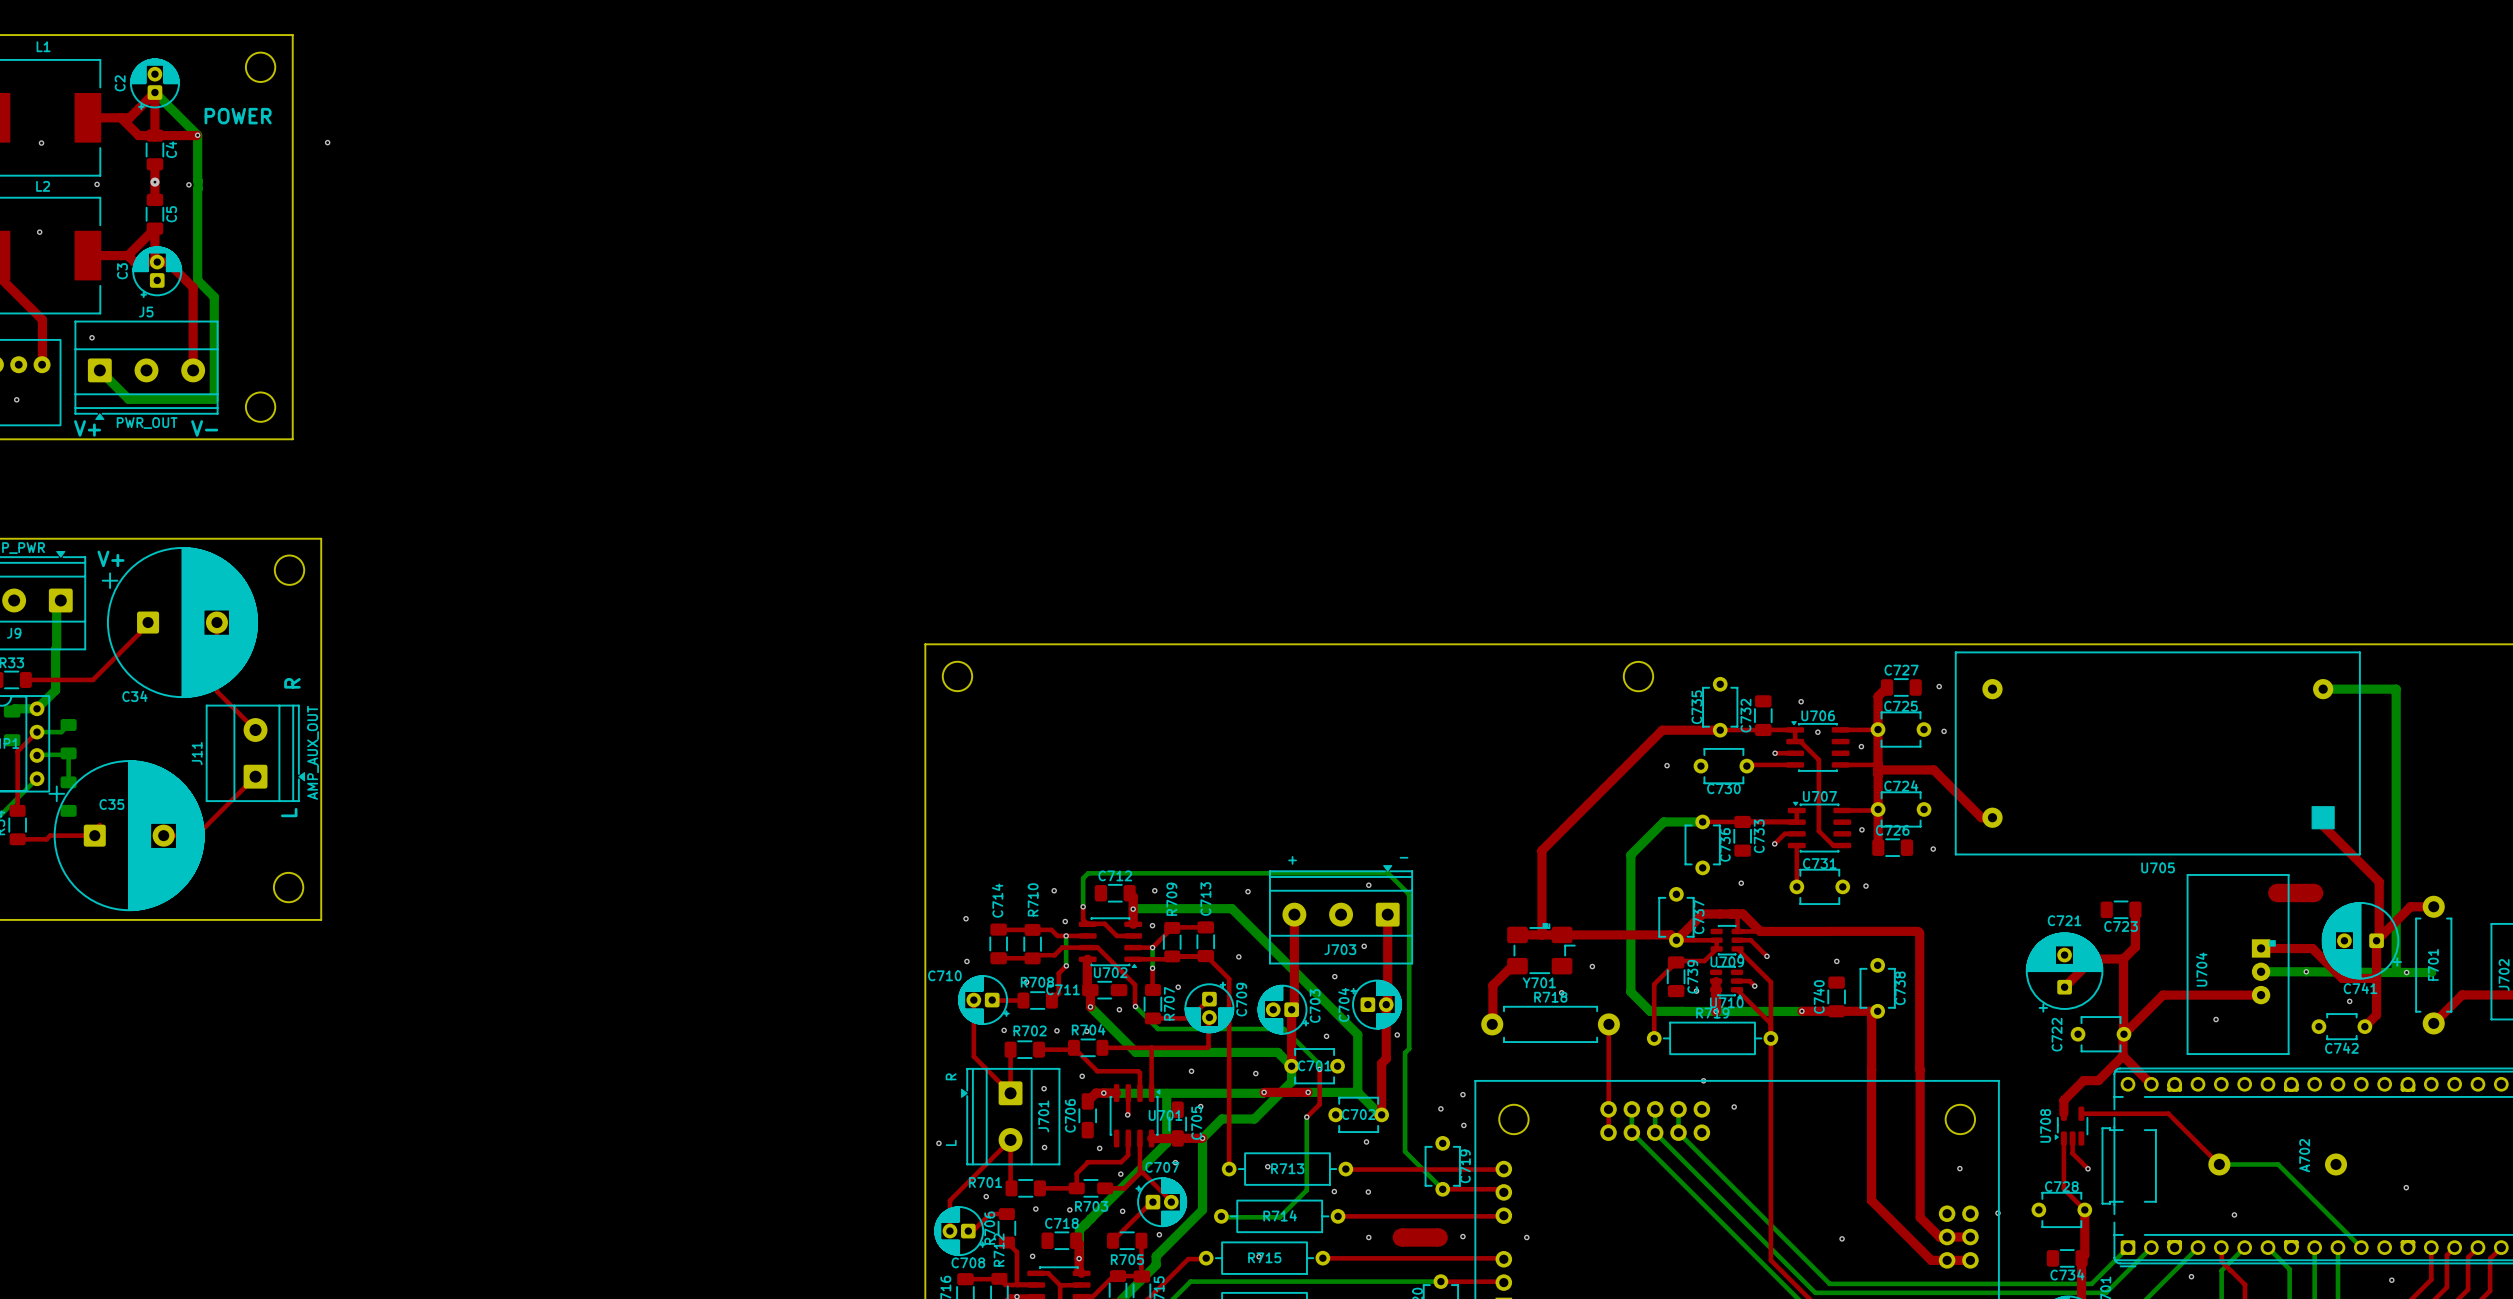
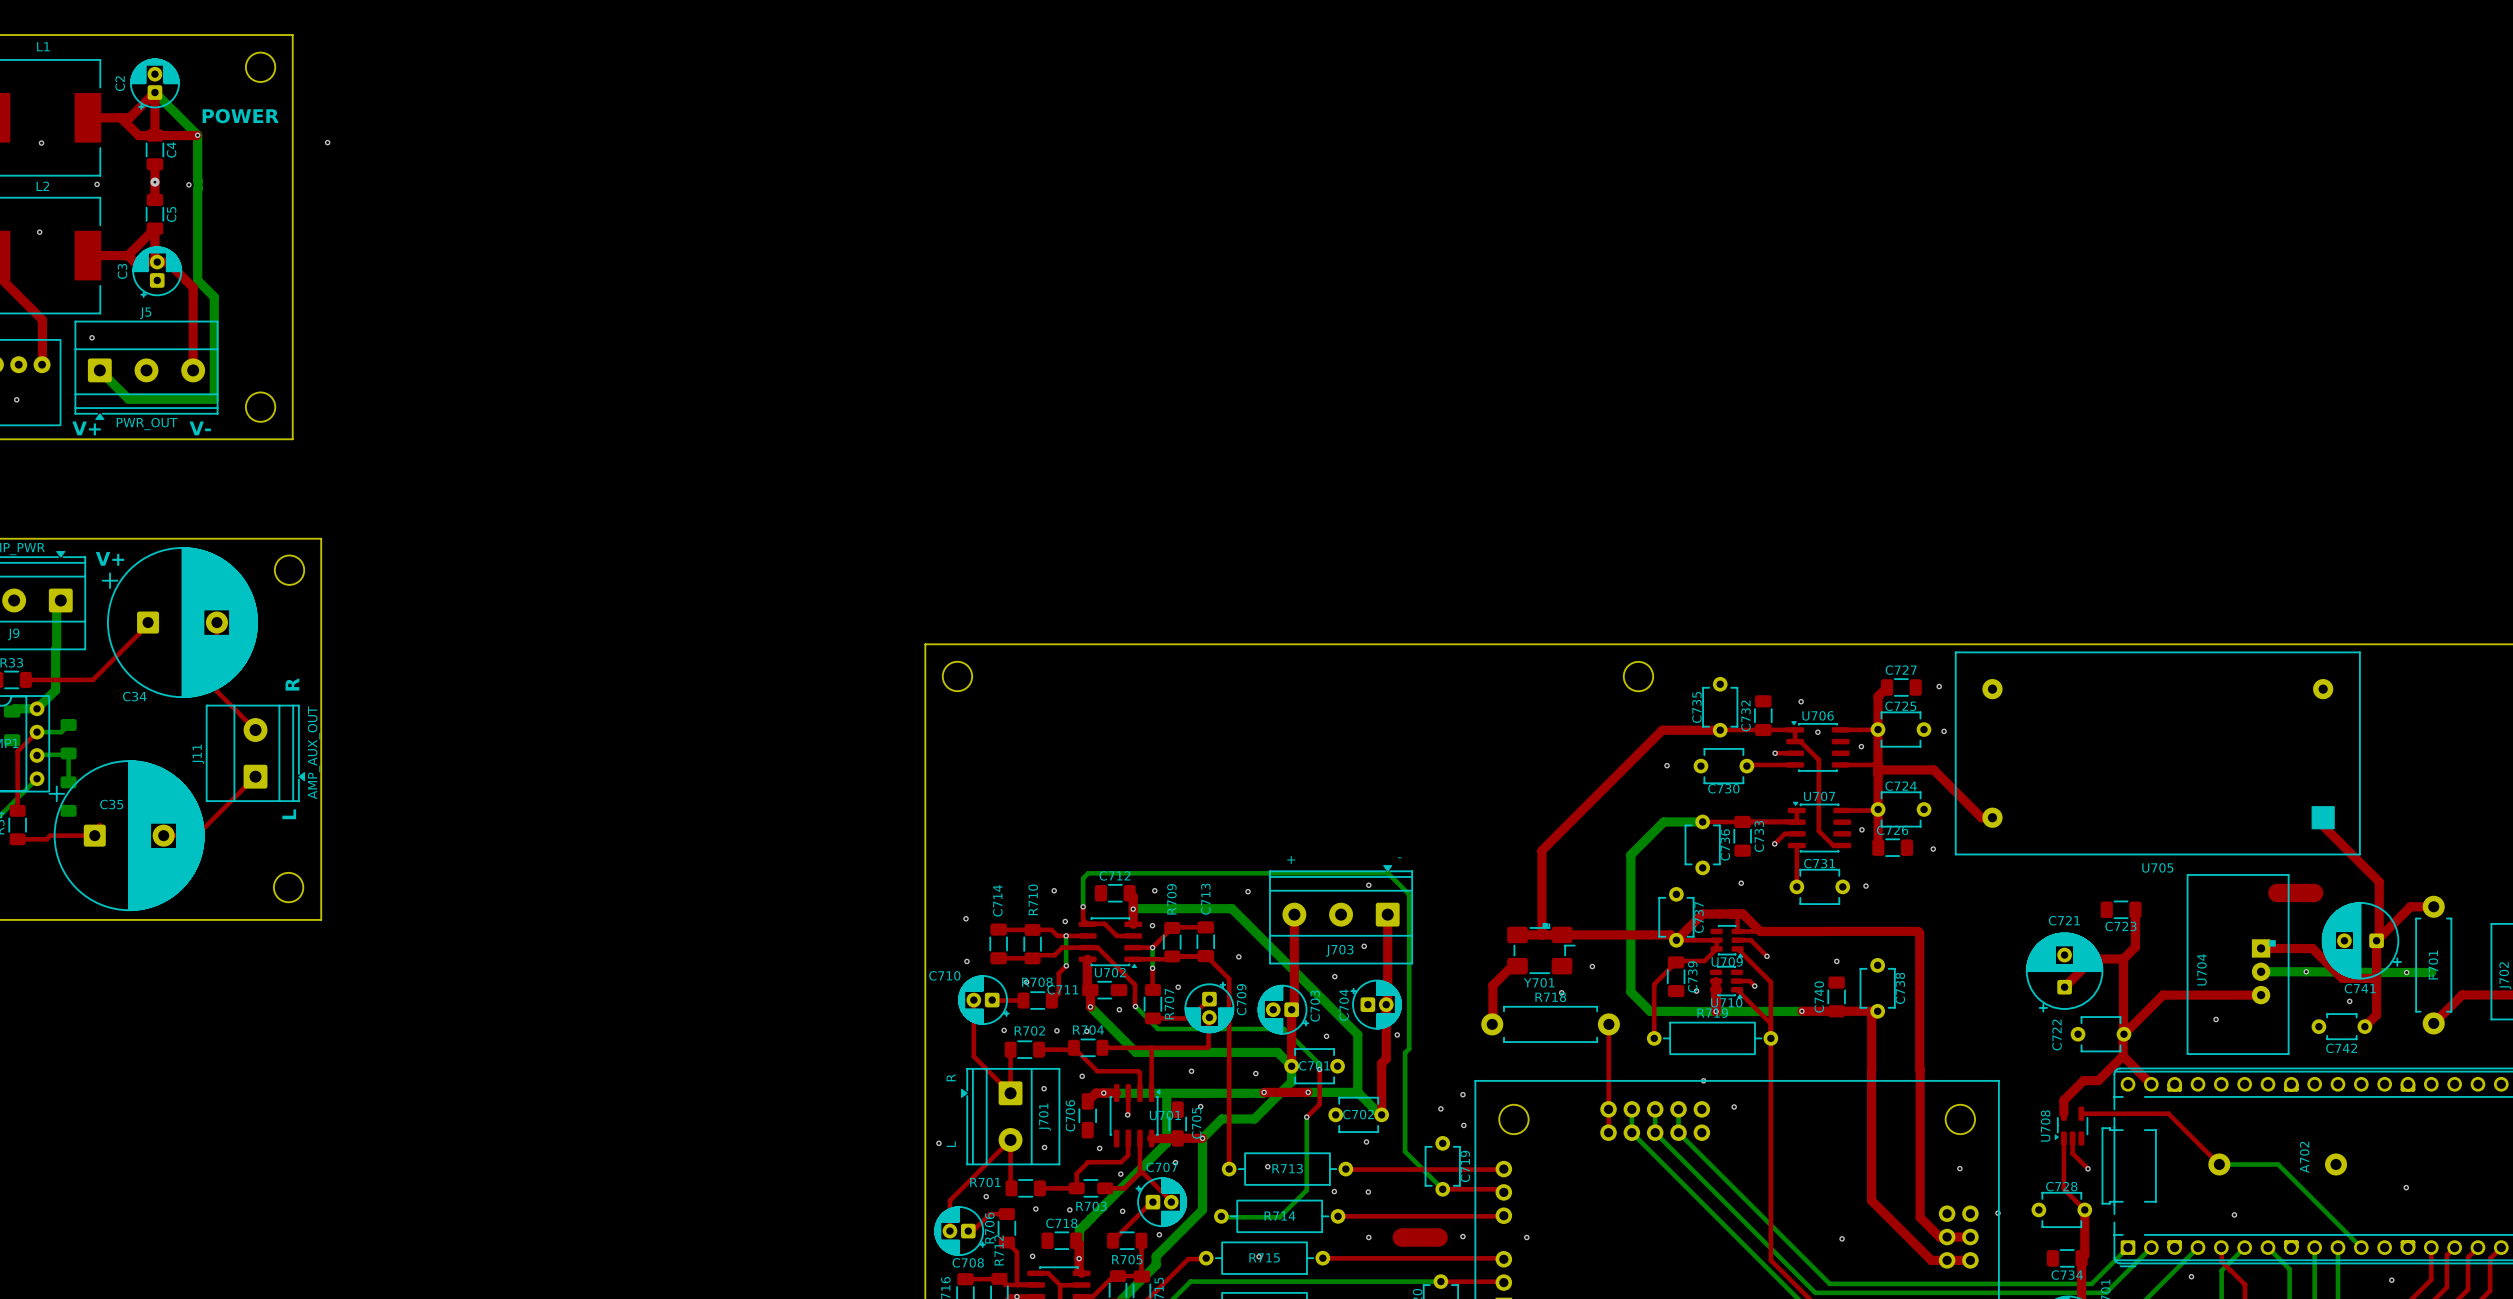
bottom track: (2323, 689) (2396, 689) (2396, 972) -> none

